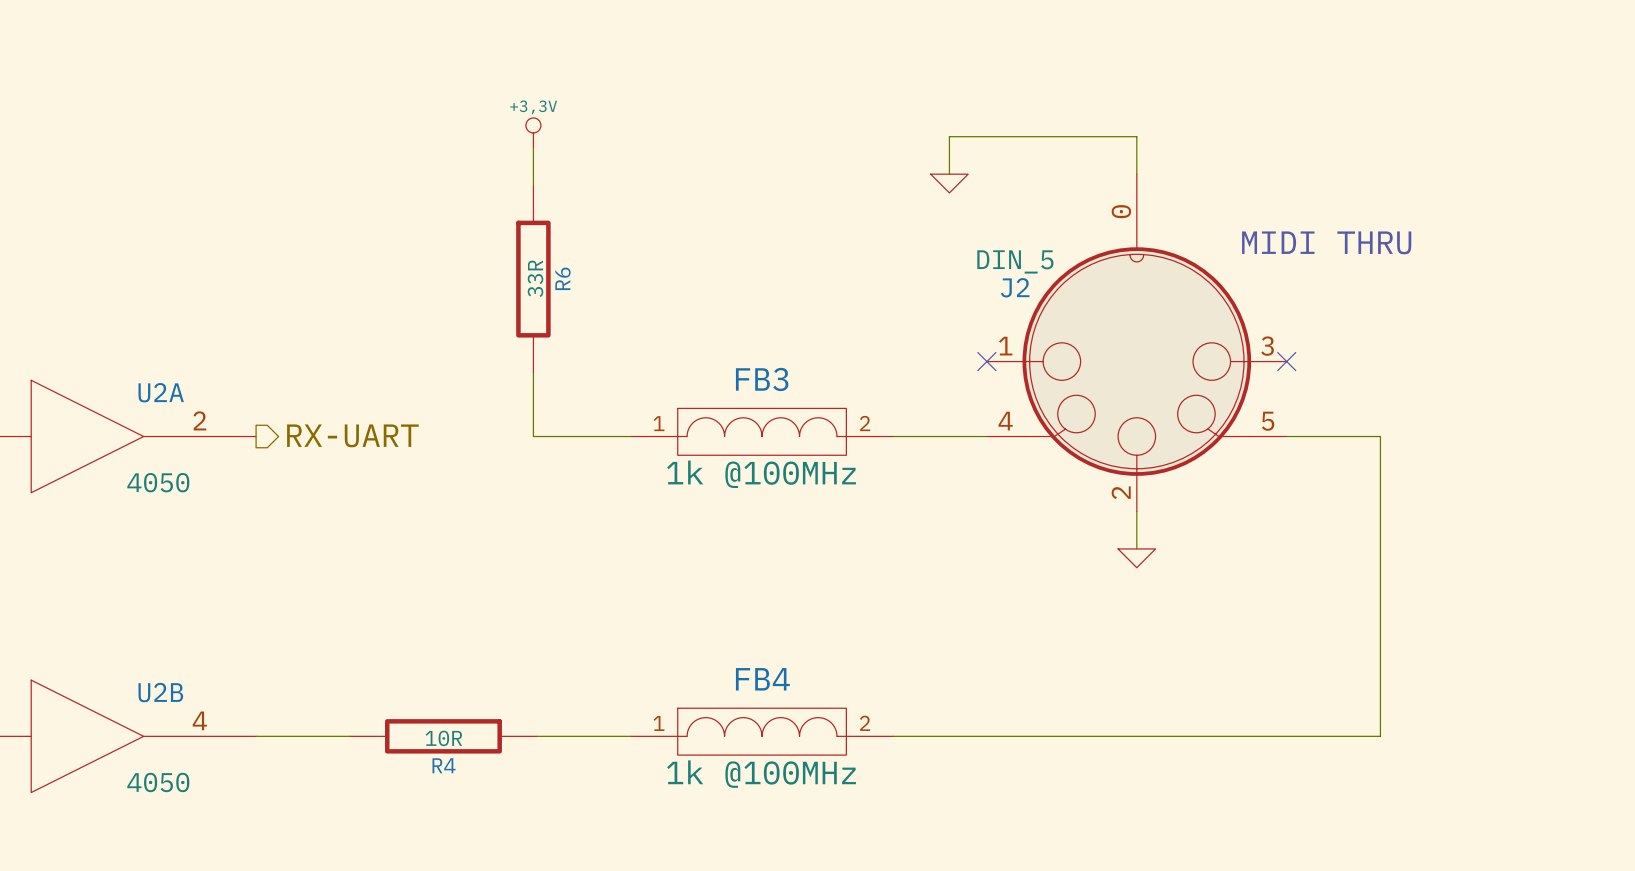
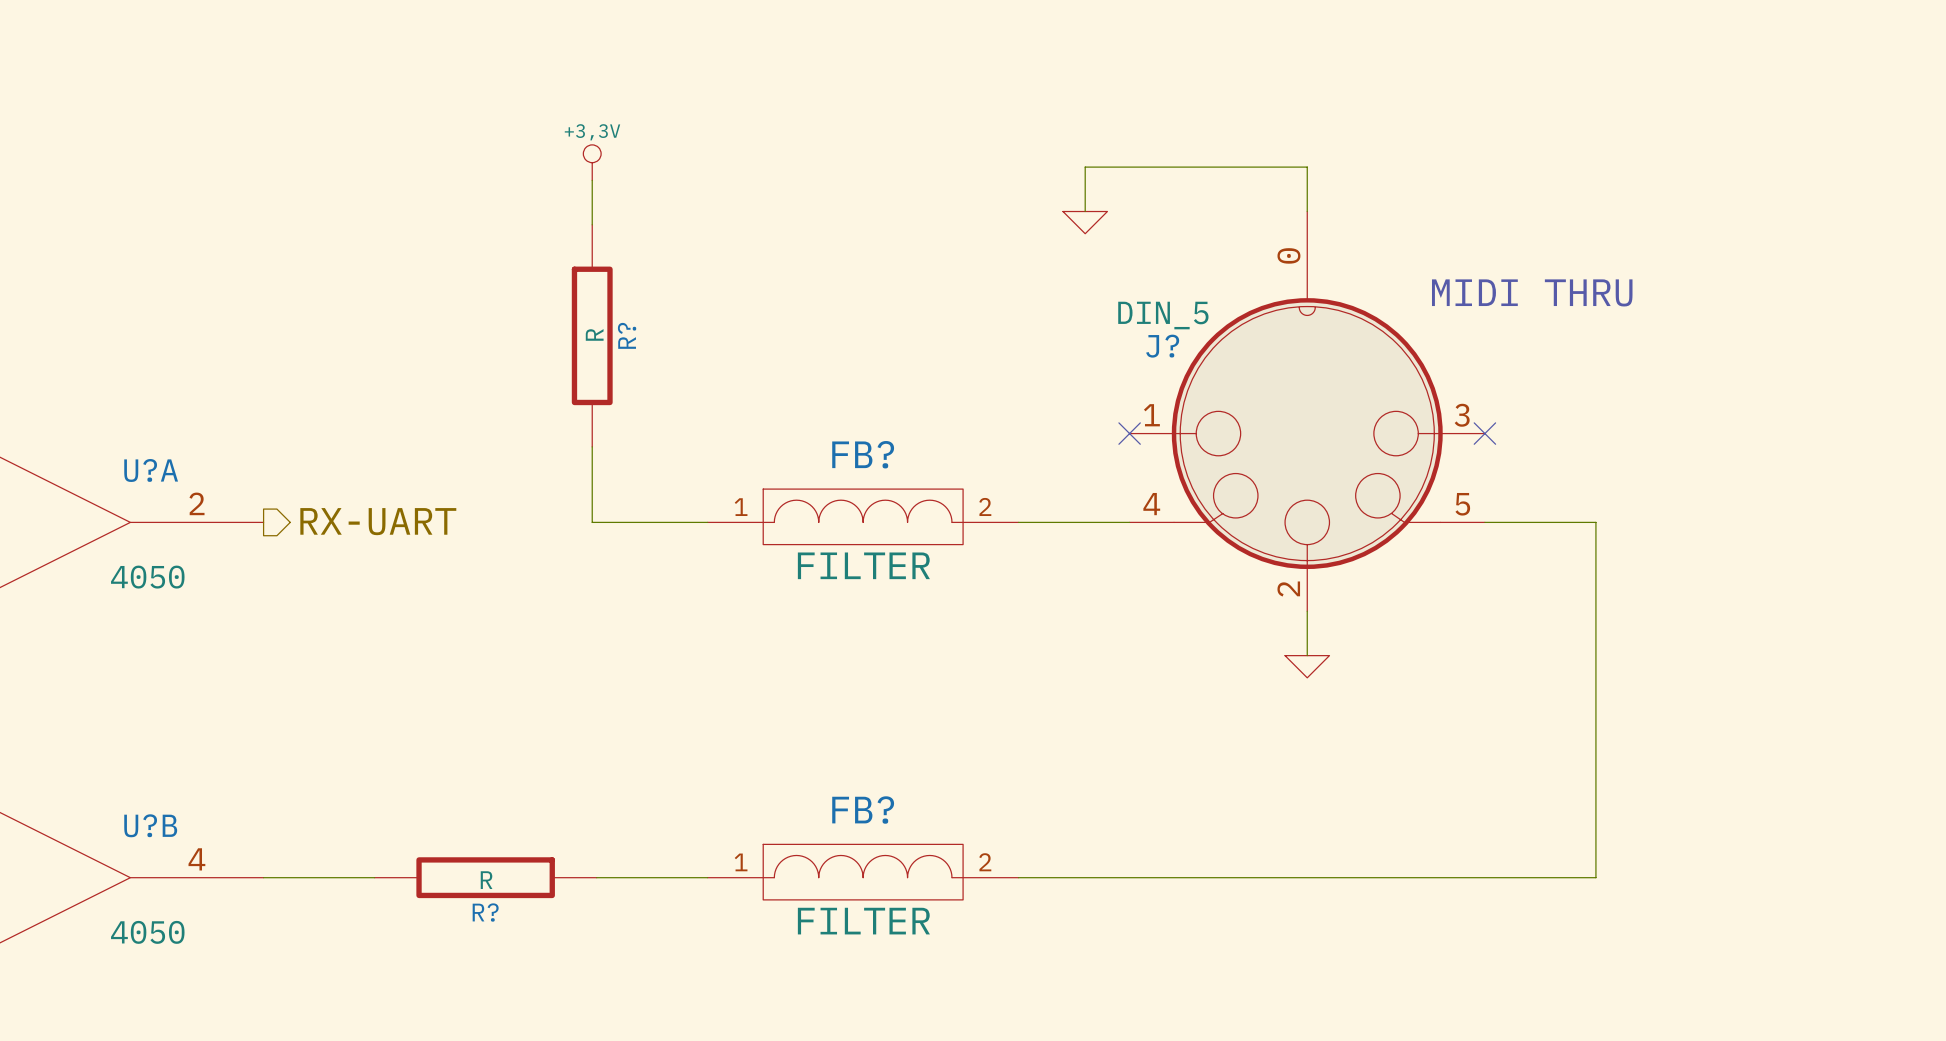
R6 value: 33R (535, 278) -> R (594, 334)
R6 name: R6 (562, 278) -> R? (627, 335)
J2 name: J2 (1015, 287) -> J? (1162, 346)
FB3 name: FB3 (762, 379) -> FB? (863, 454)
U2A name: U2A (161, 392) -> U?A (151, 470)
FB3 value: 1k @100MHz (761, 474) -> FILTER (863, 565)
FB4 name: FB4 (762, 679) -> FB? (863, 810)
U2B name: U2B (160, 692) -> U?B (150, 825)
R4 value: 10R (443, 738) -> R (486, 880)
R4 name: R4 (444, 765) -> R? (485, 912)
FB4 value: 1k @100MHz (761, 774) -> FILTER (863, 921)

